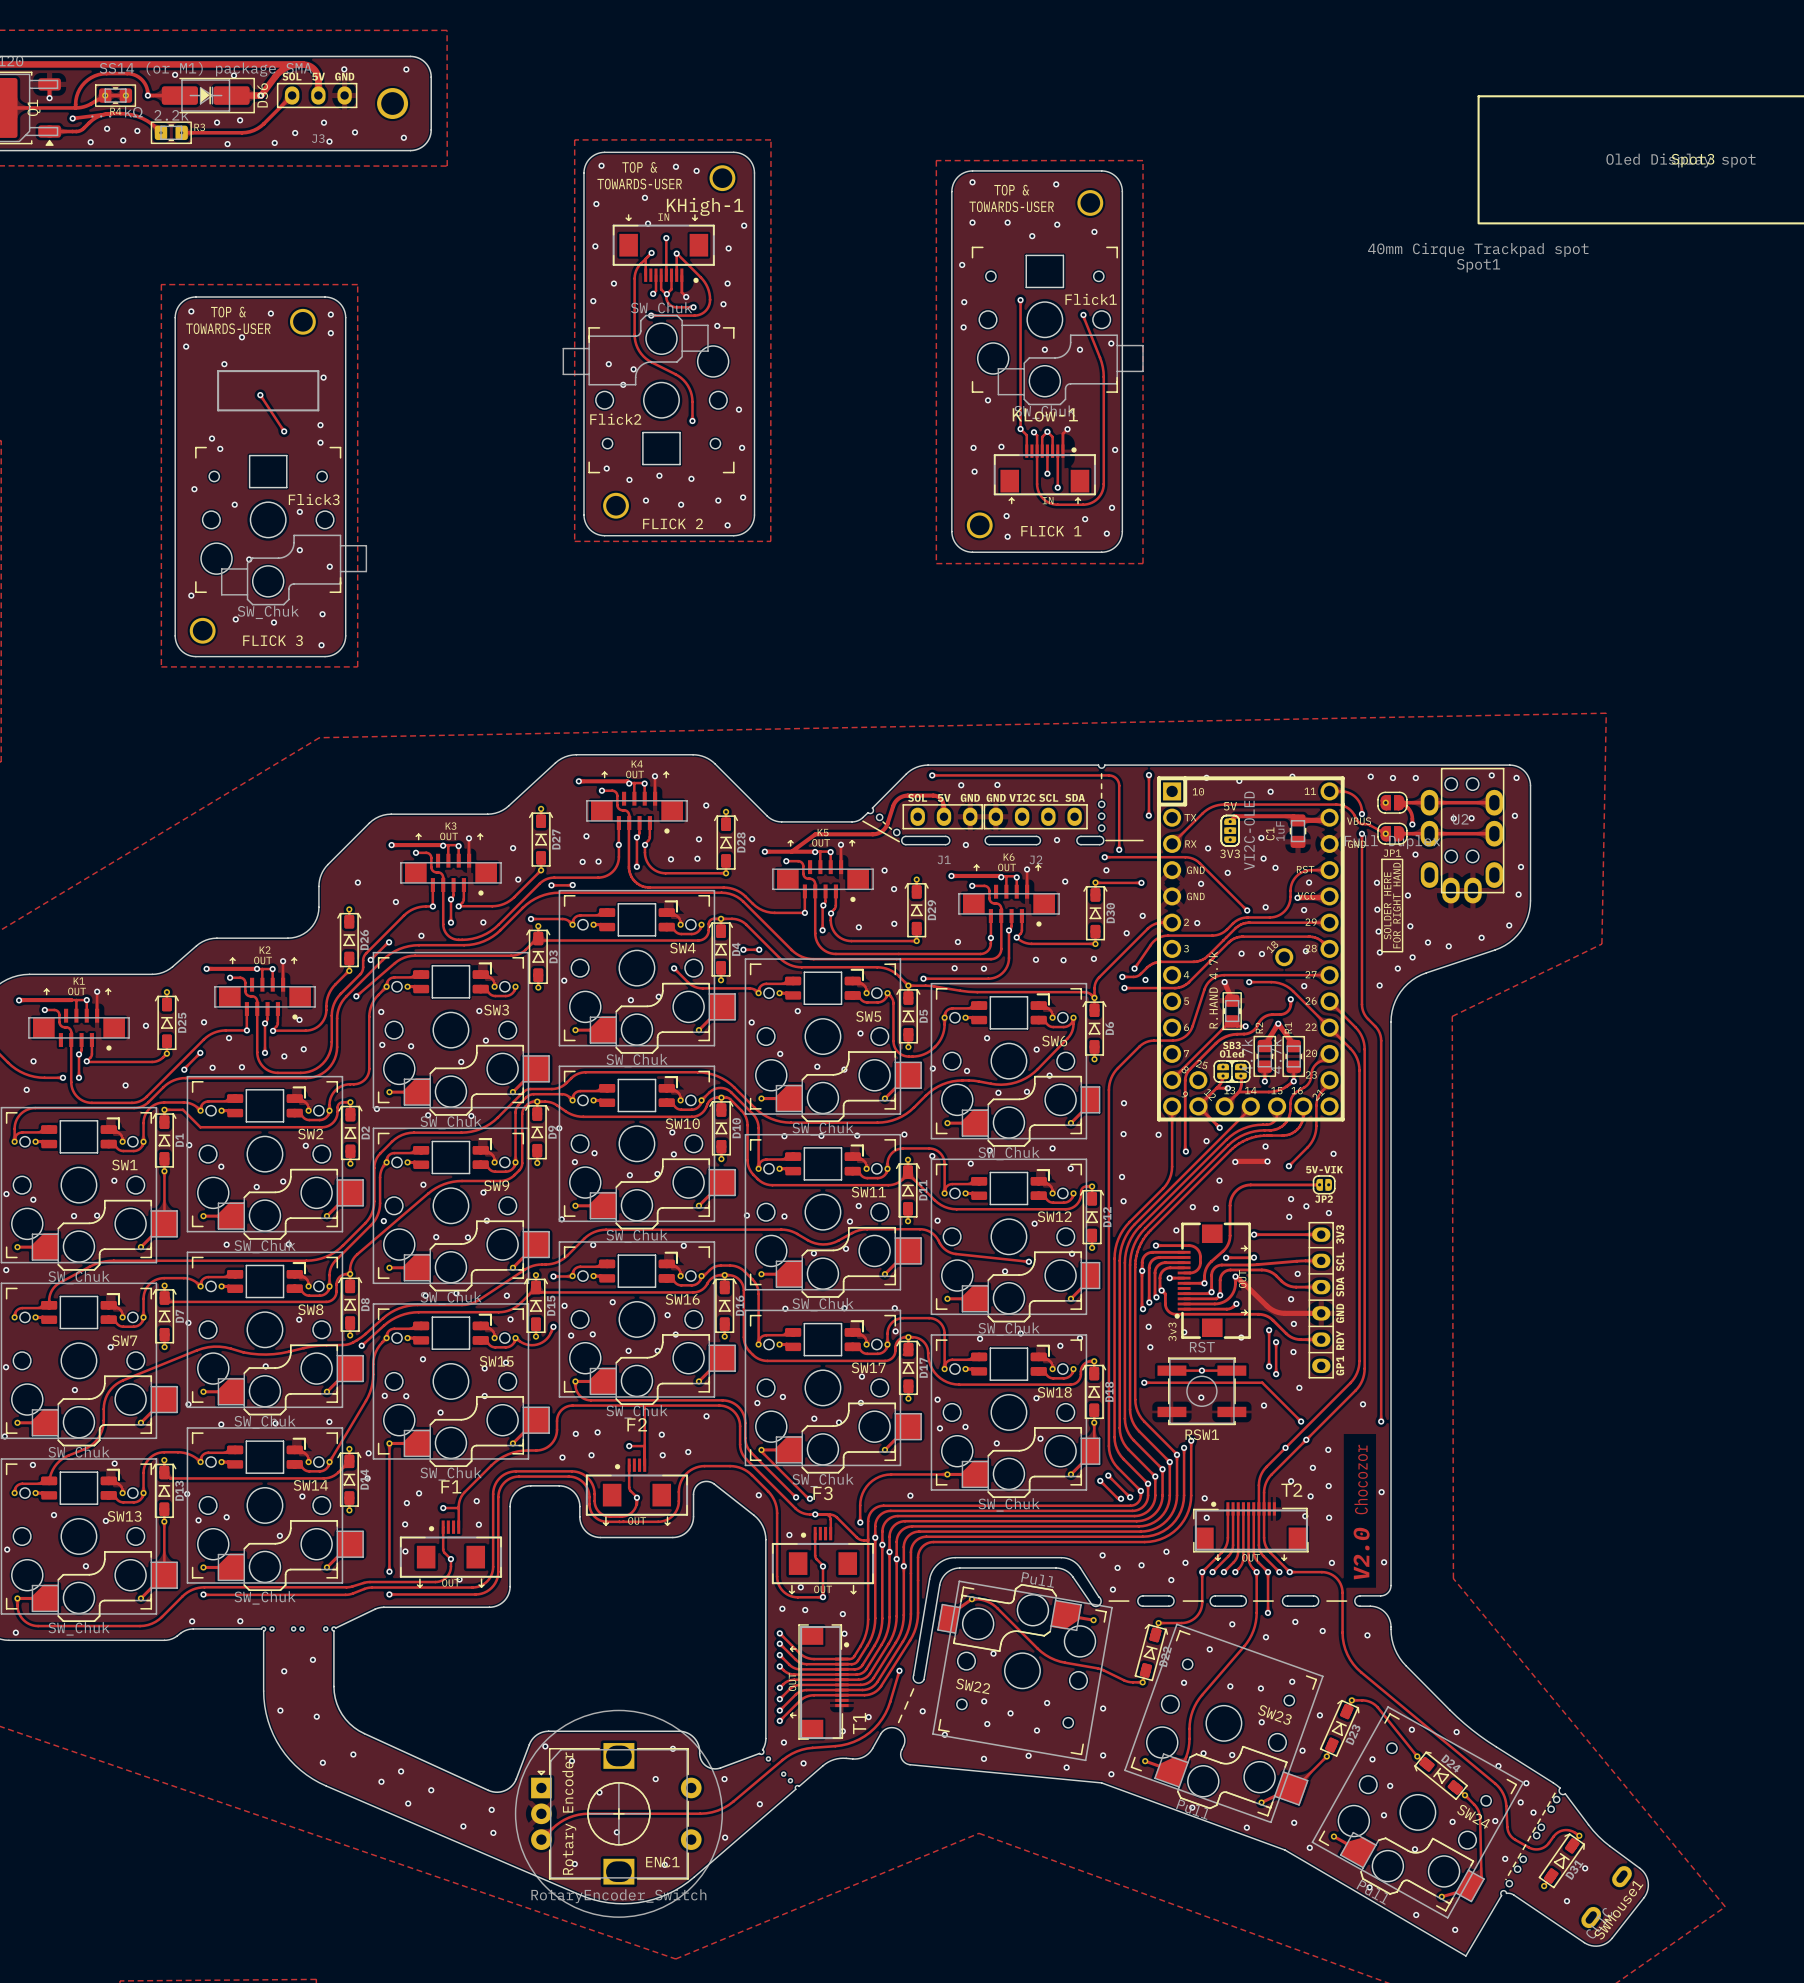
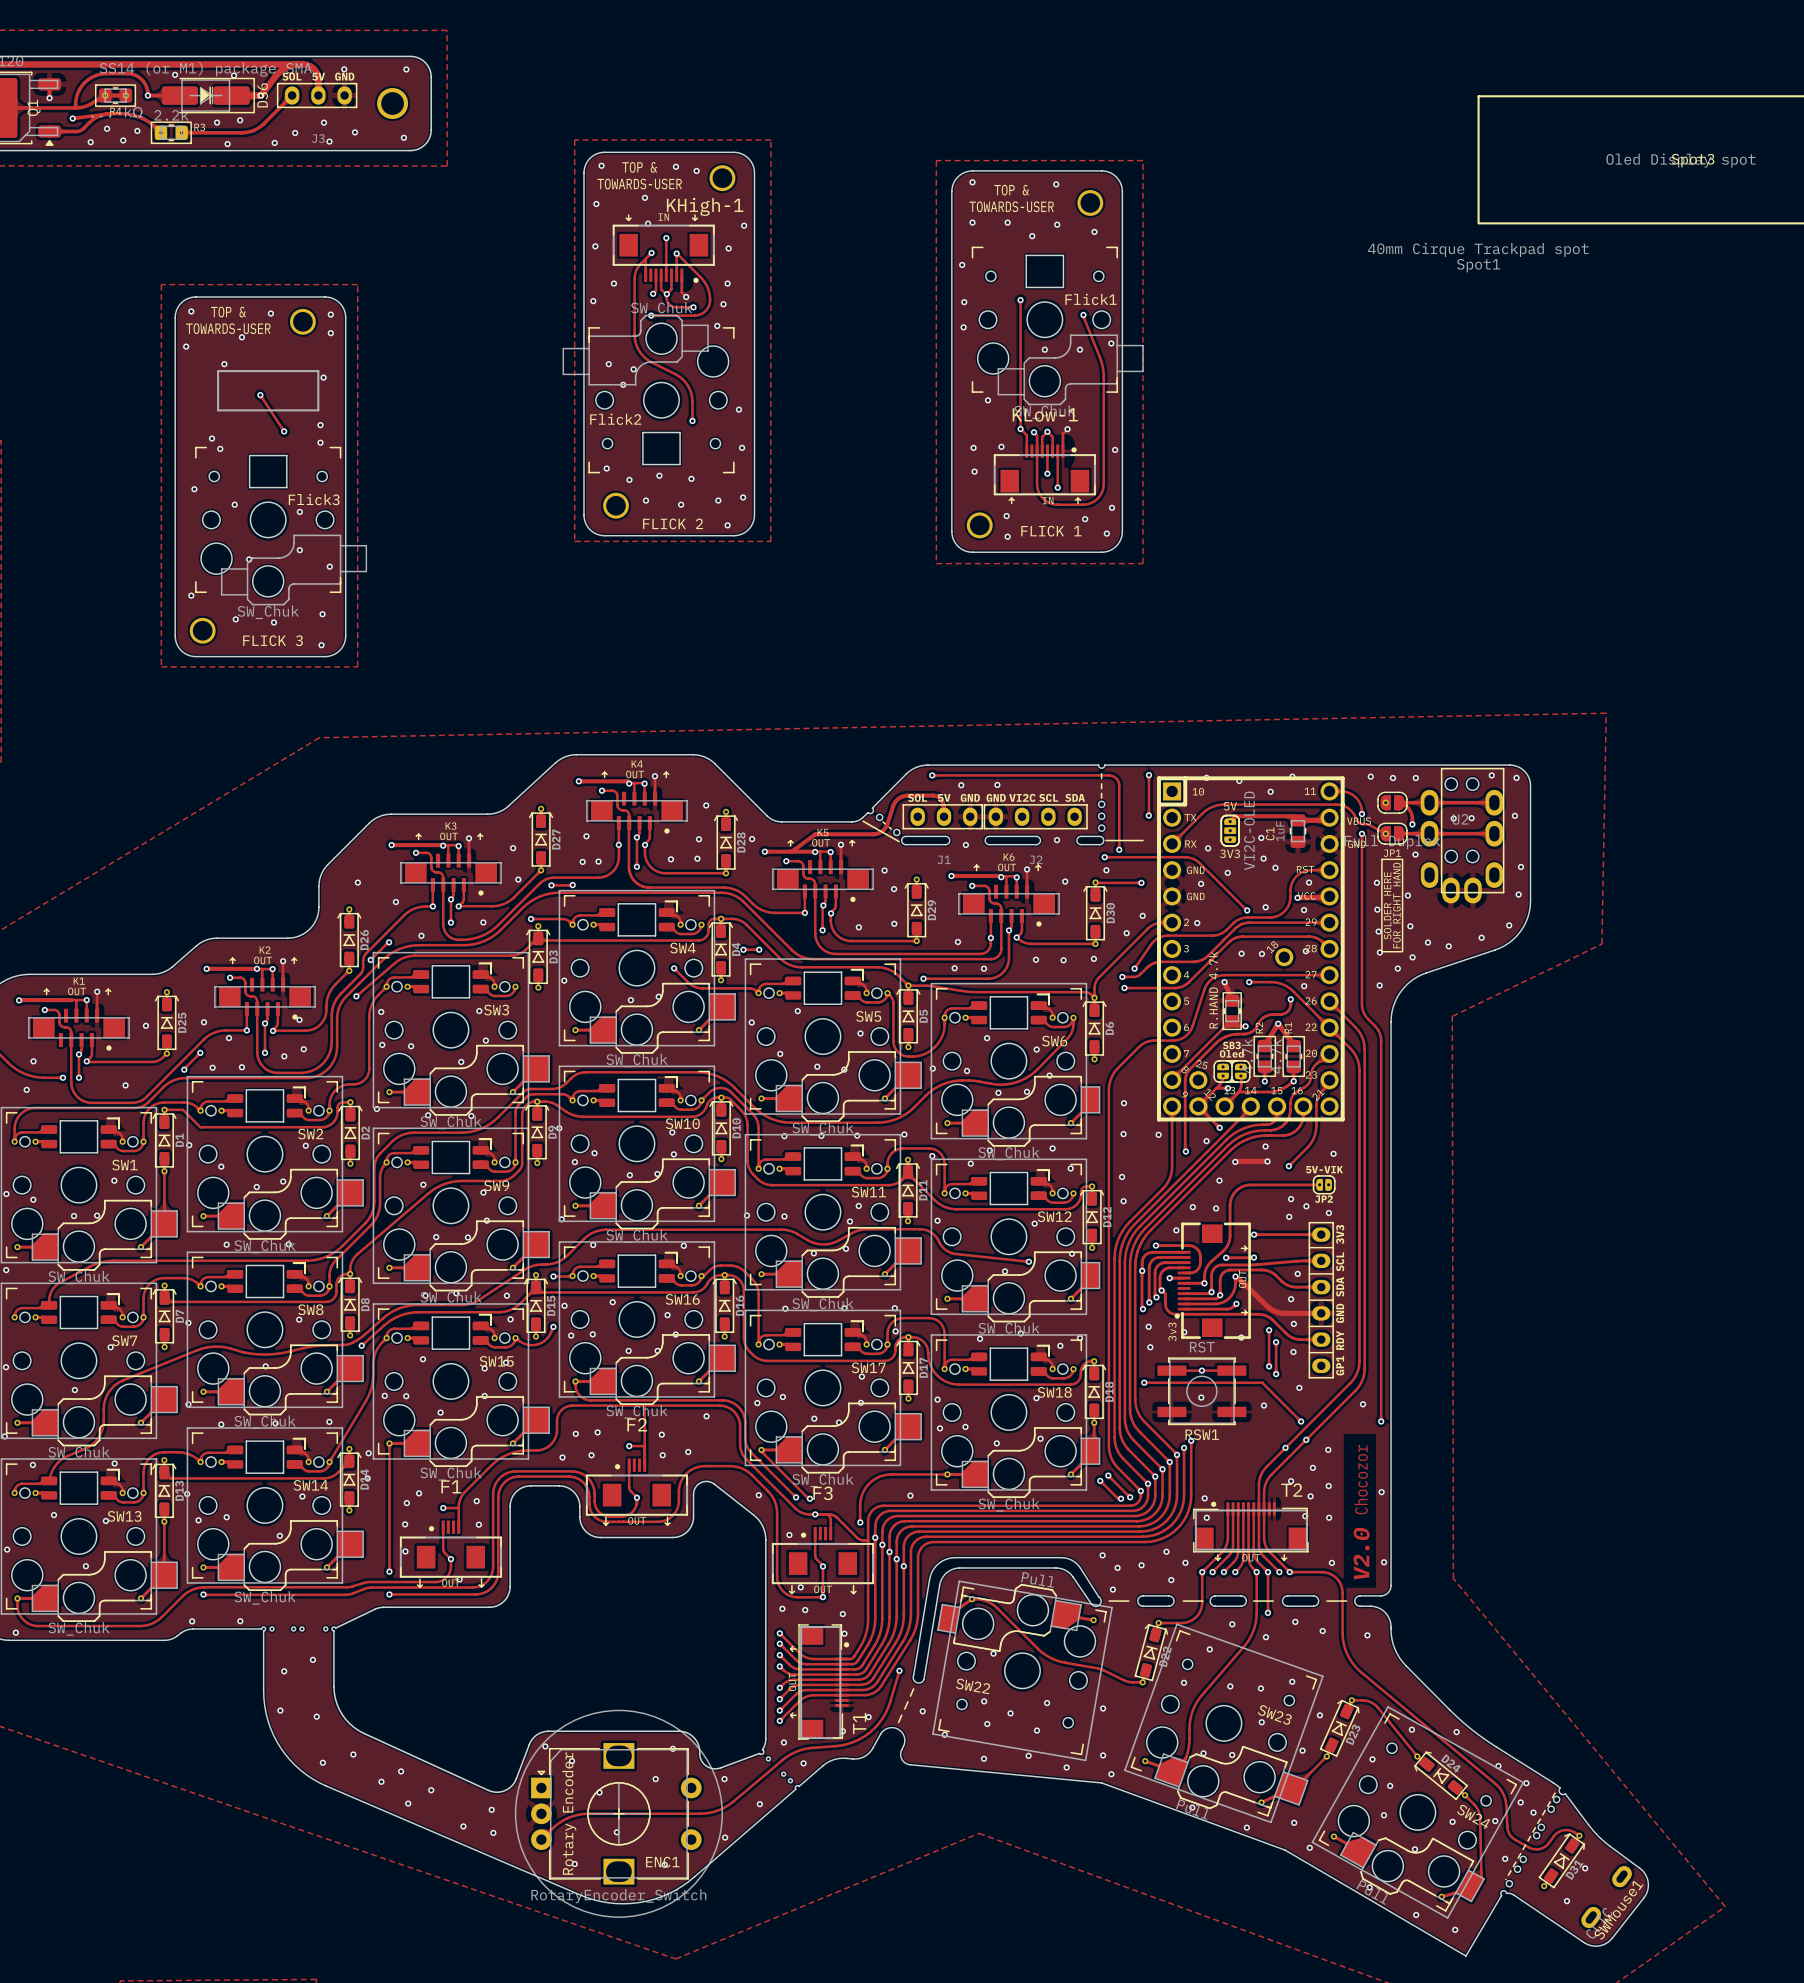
via: (1145, 979) -> none
via: (383, 1221) -> none

